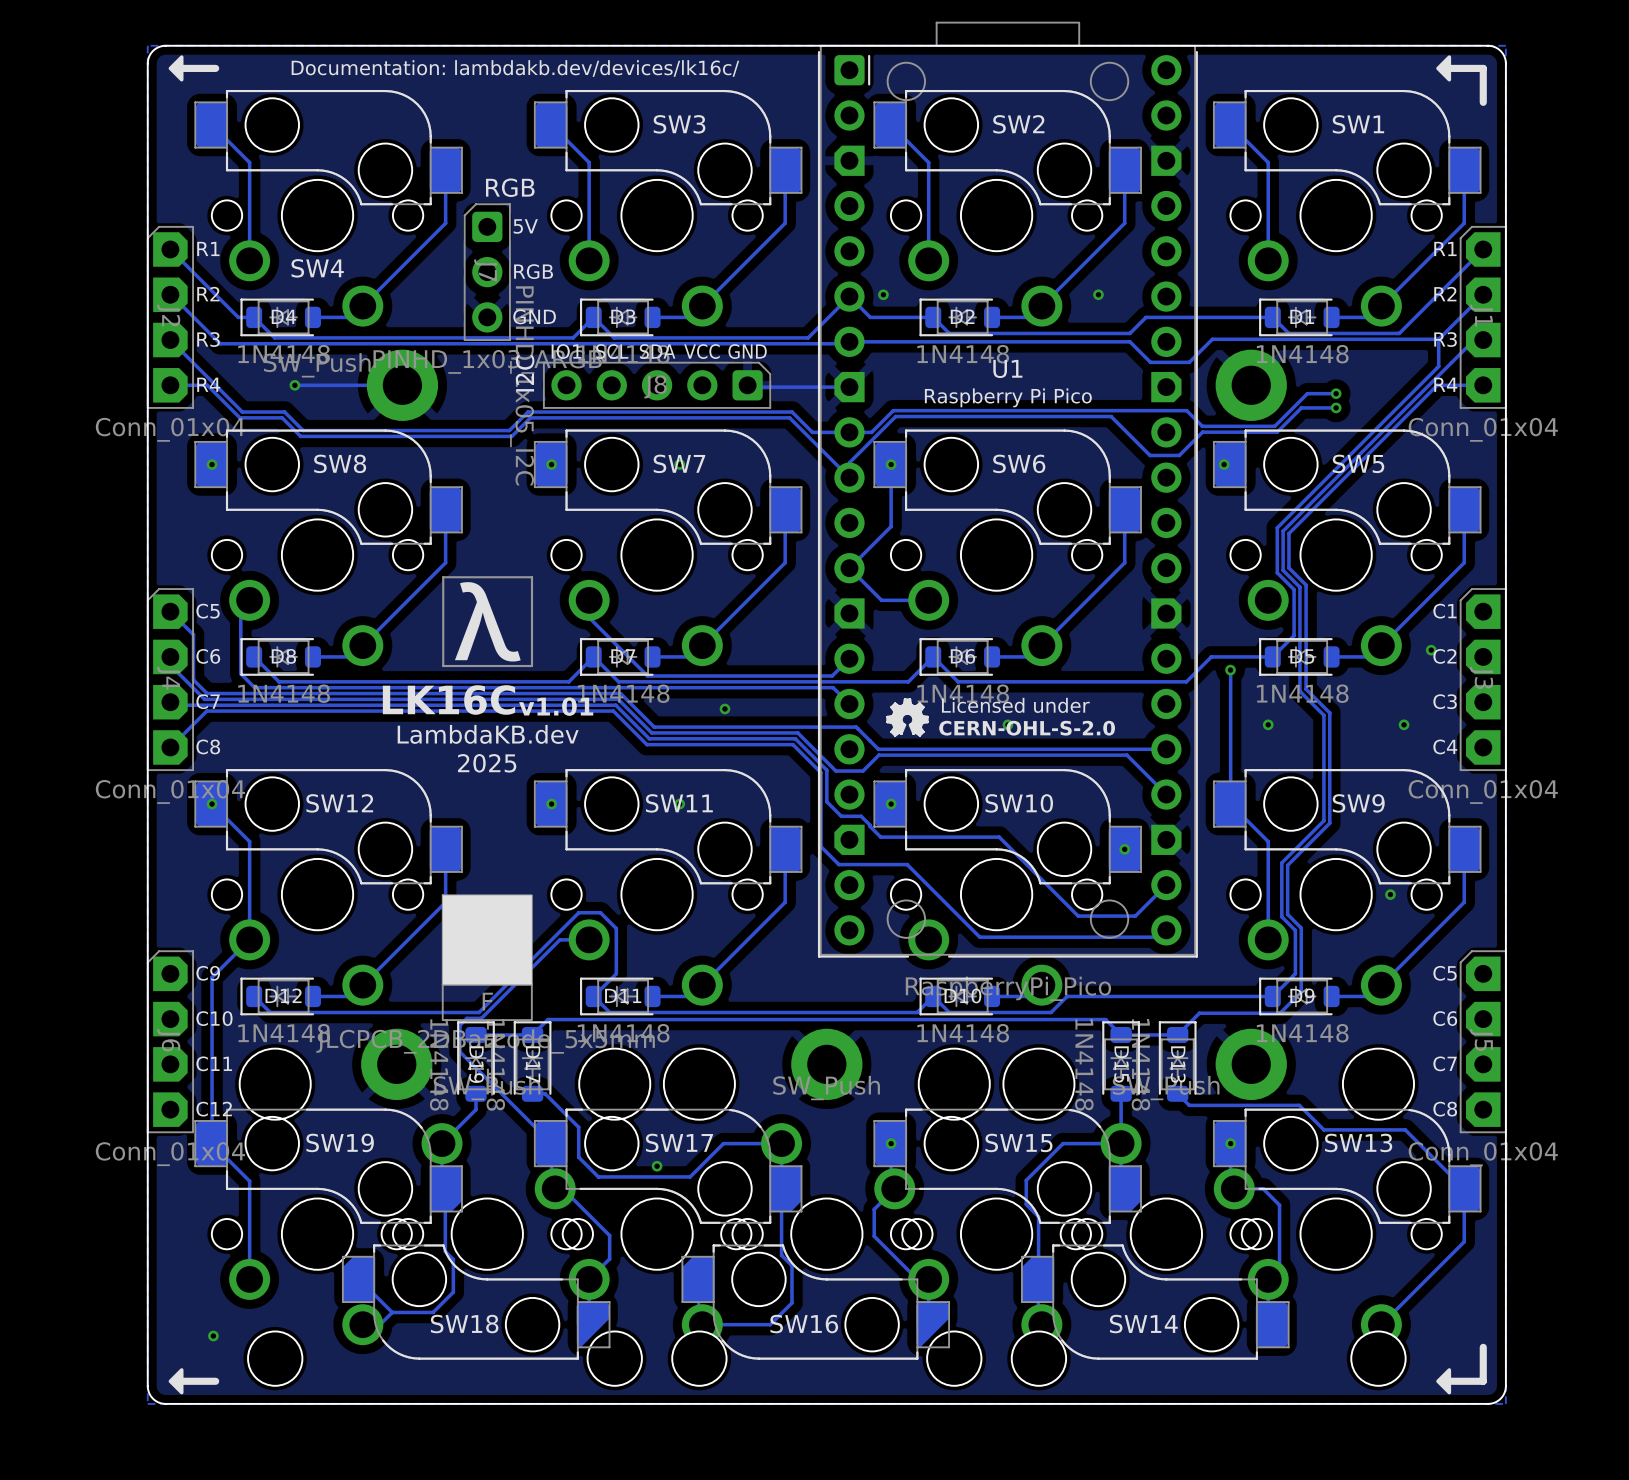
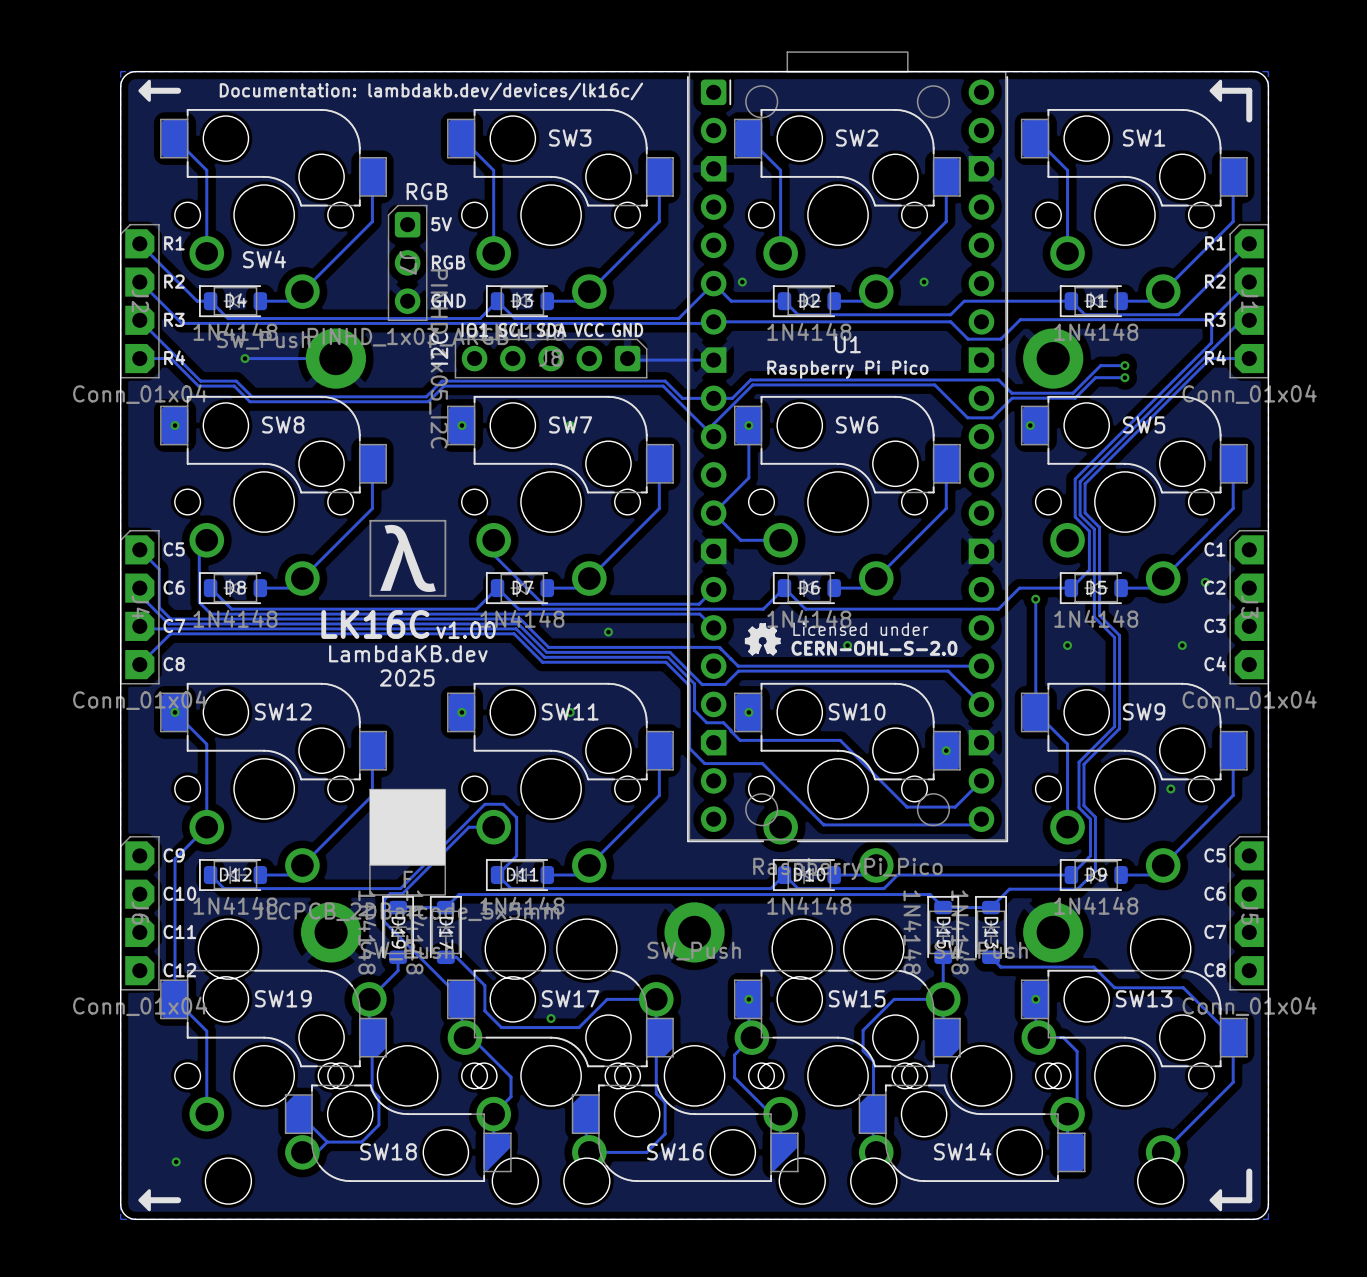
text: v1.01 (556, 706) -> v1.00 (466, 630)

